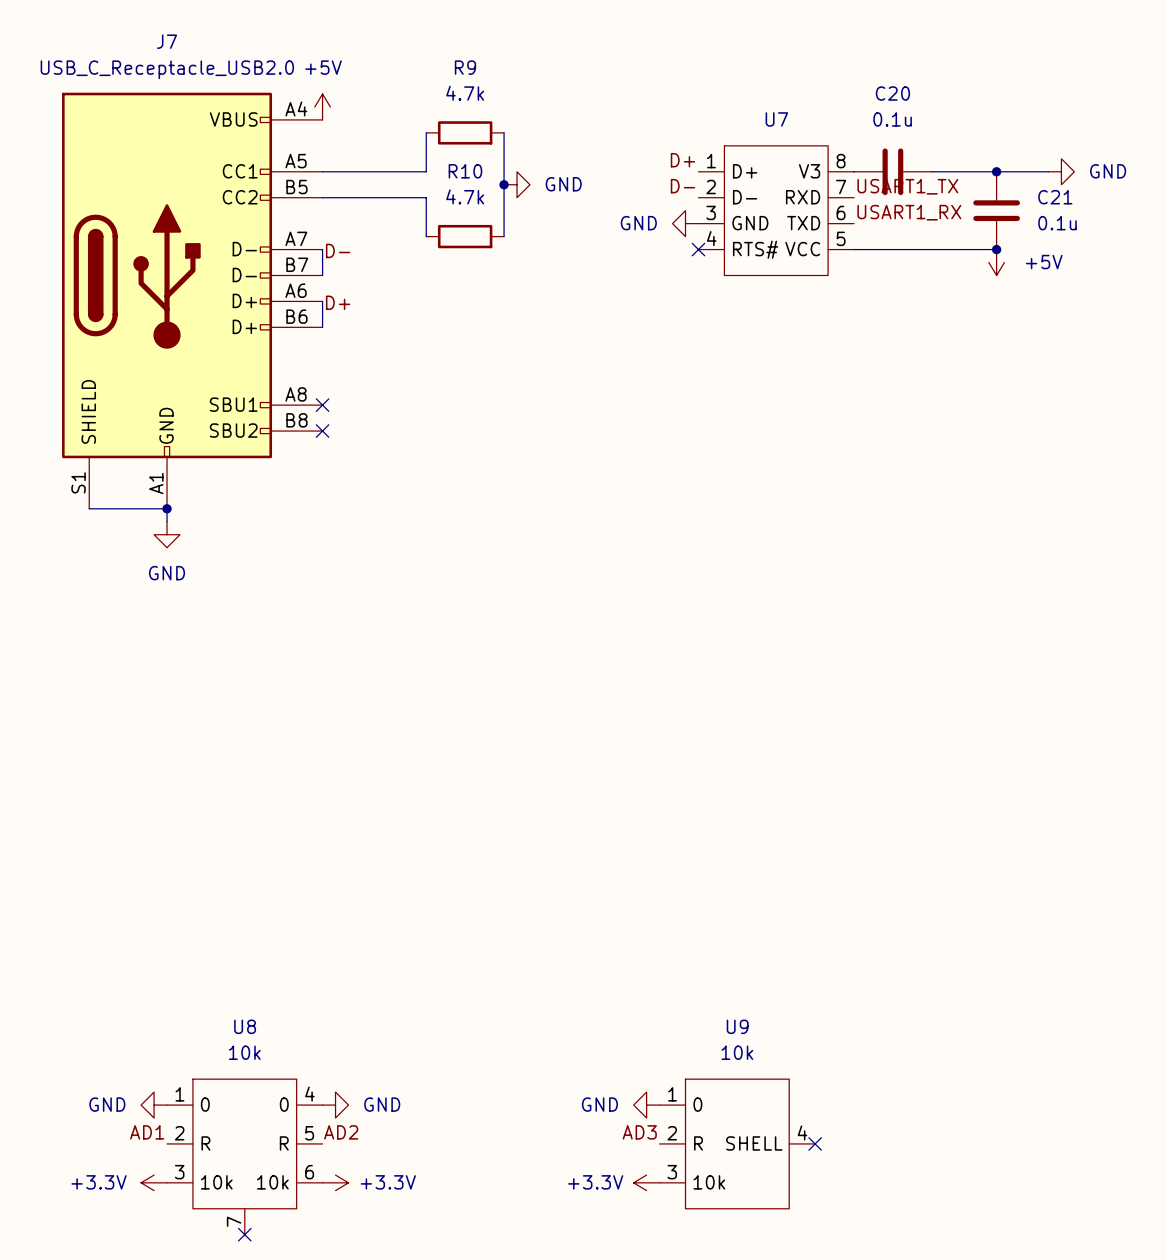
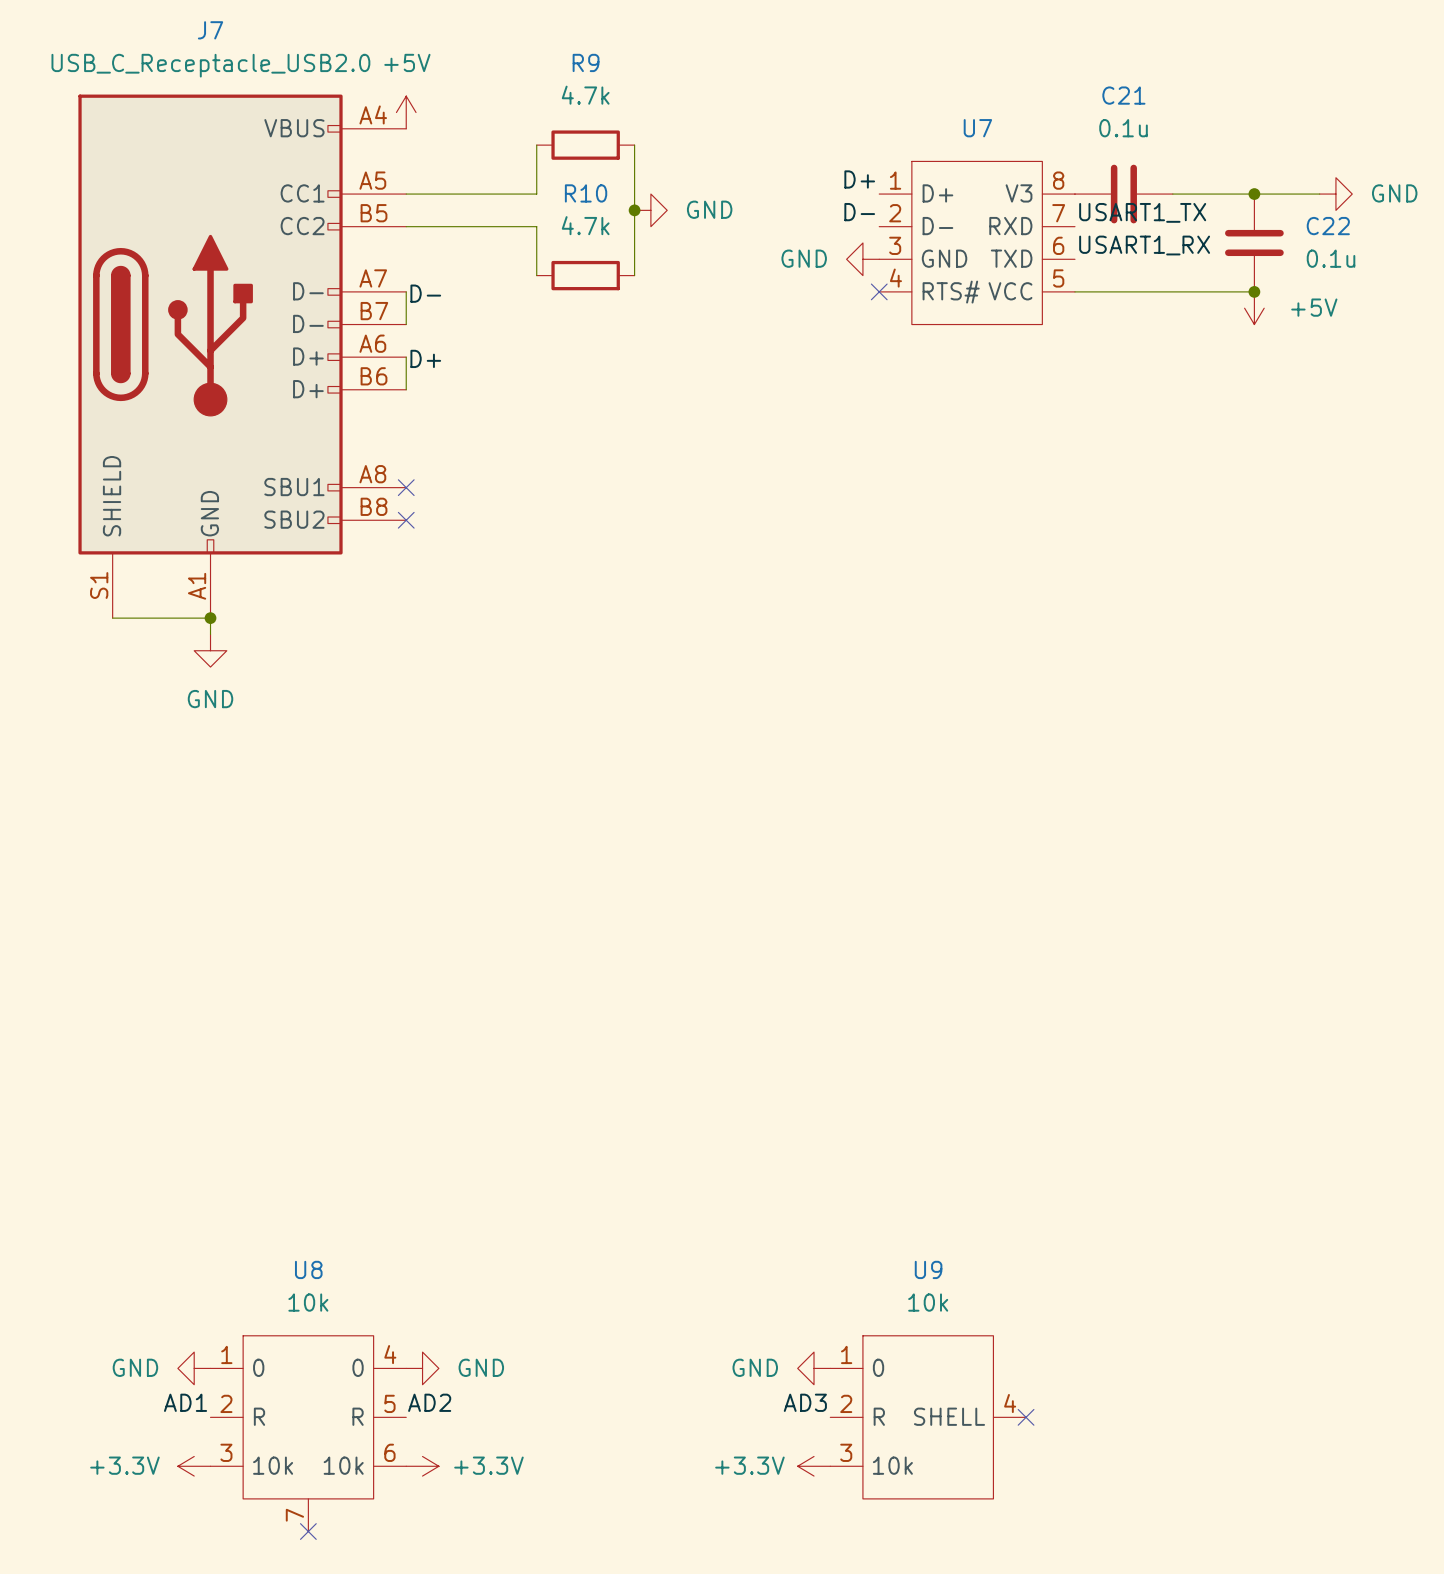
C20 name: C20 (892, 93) -> C21 (1123, 95)
C21 name: C21 (1055, 197) -> C22 (1328, 226)

